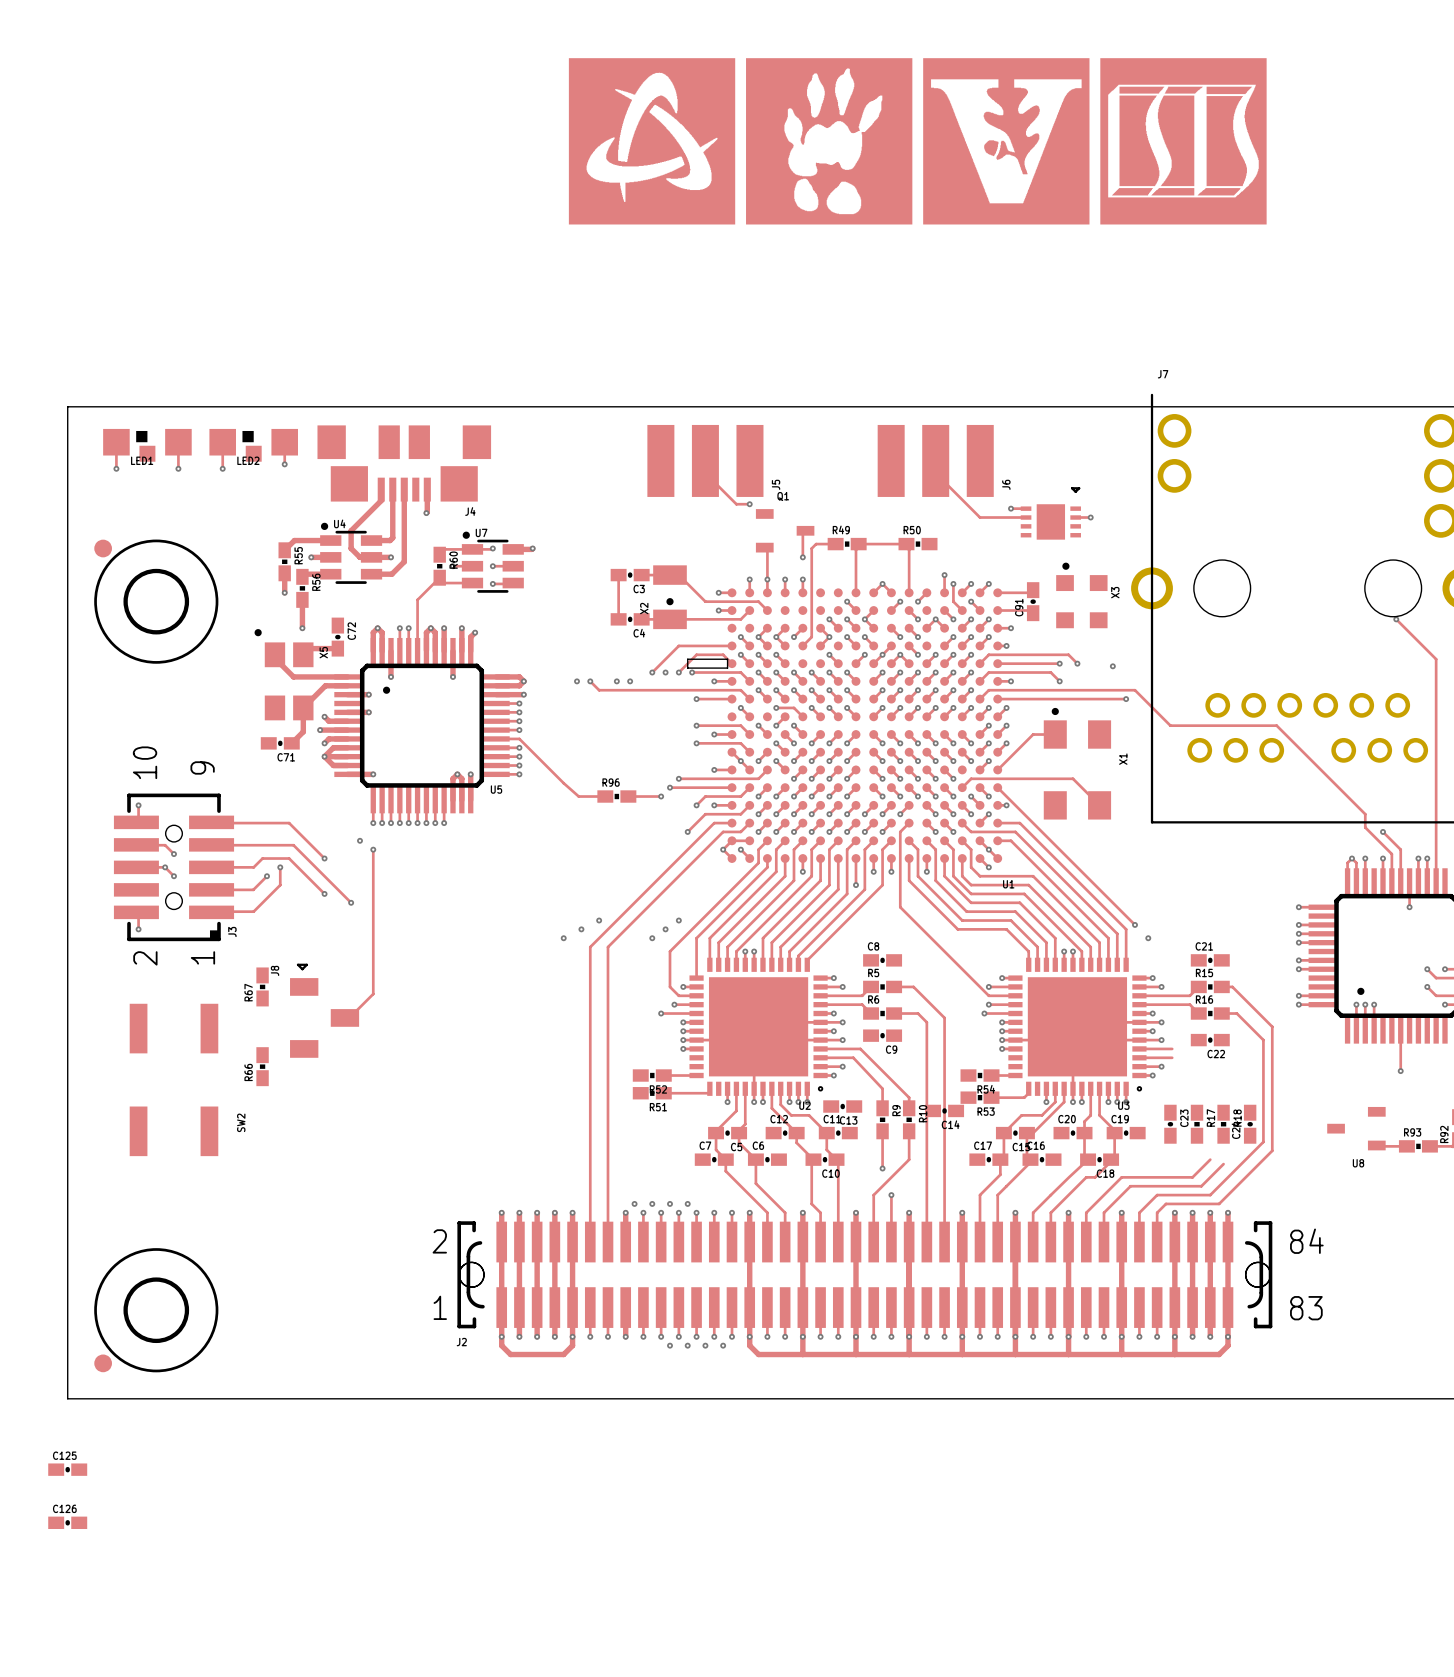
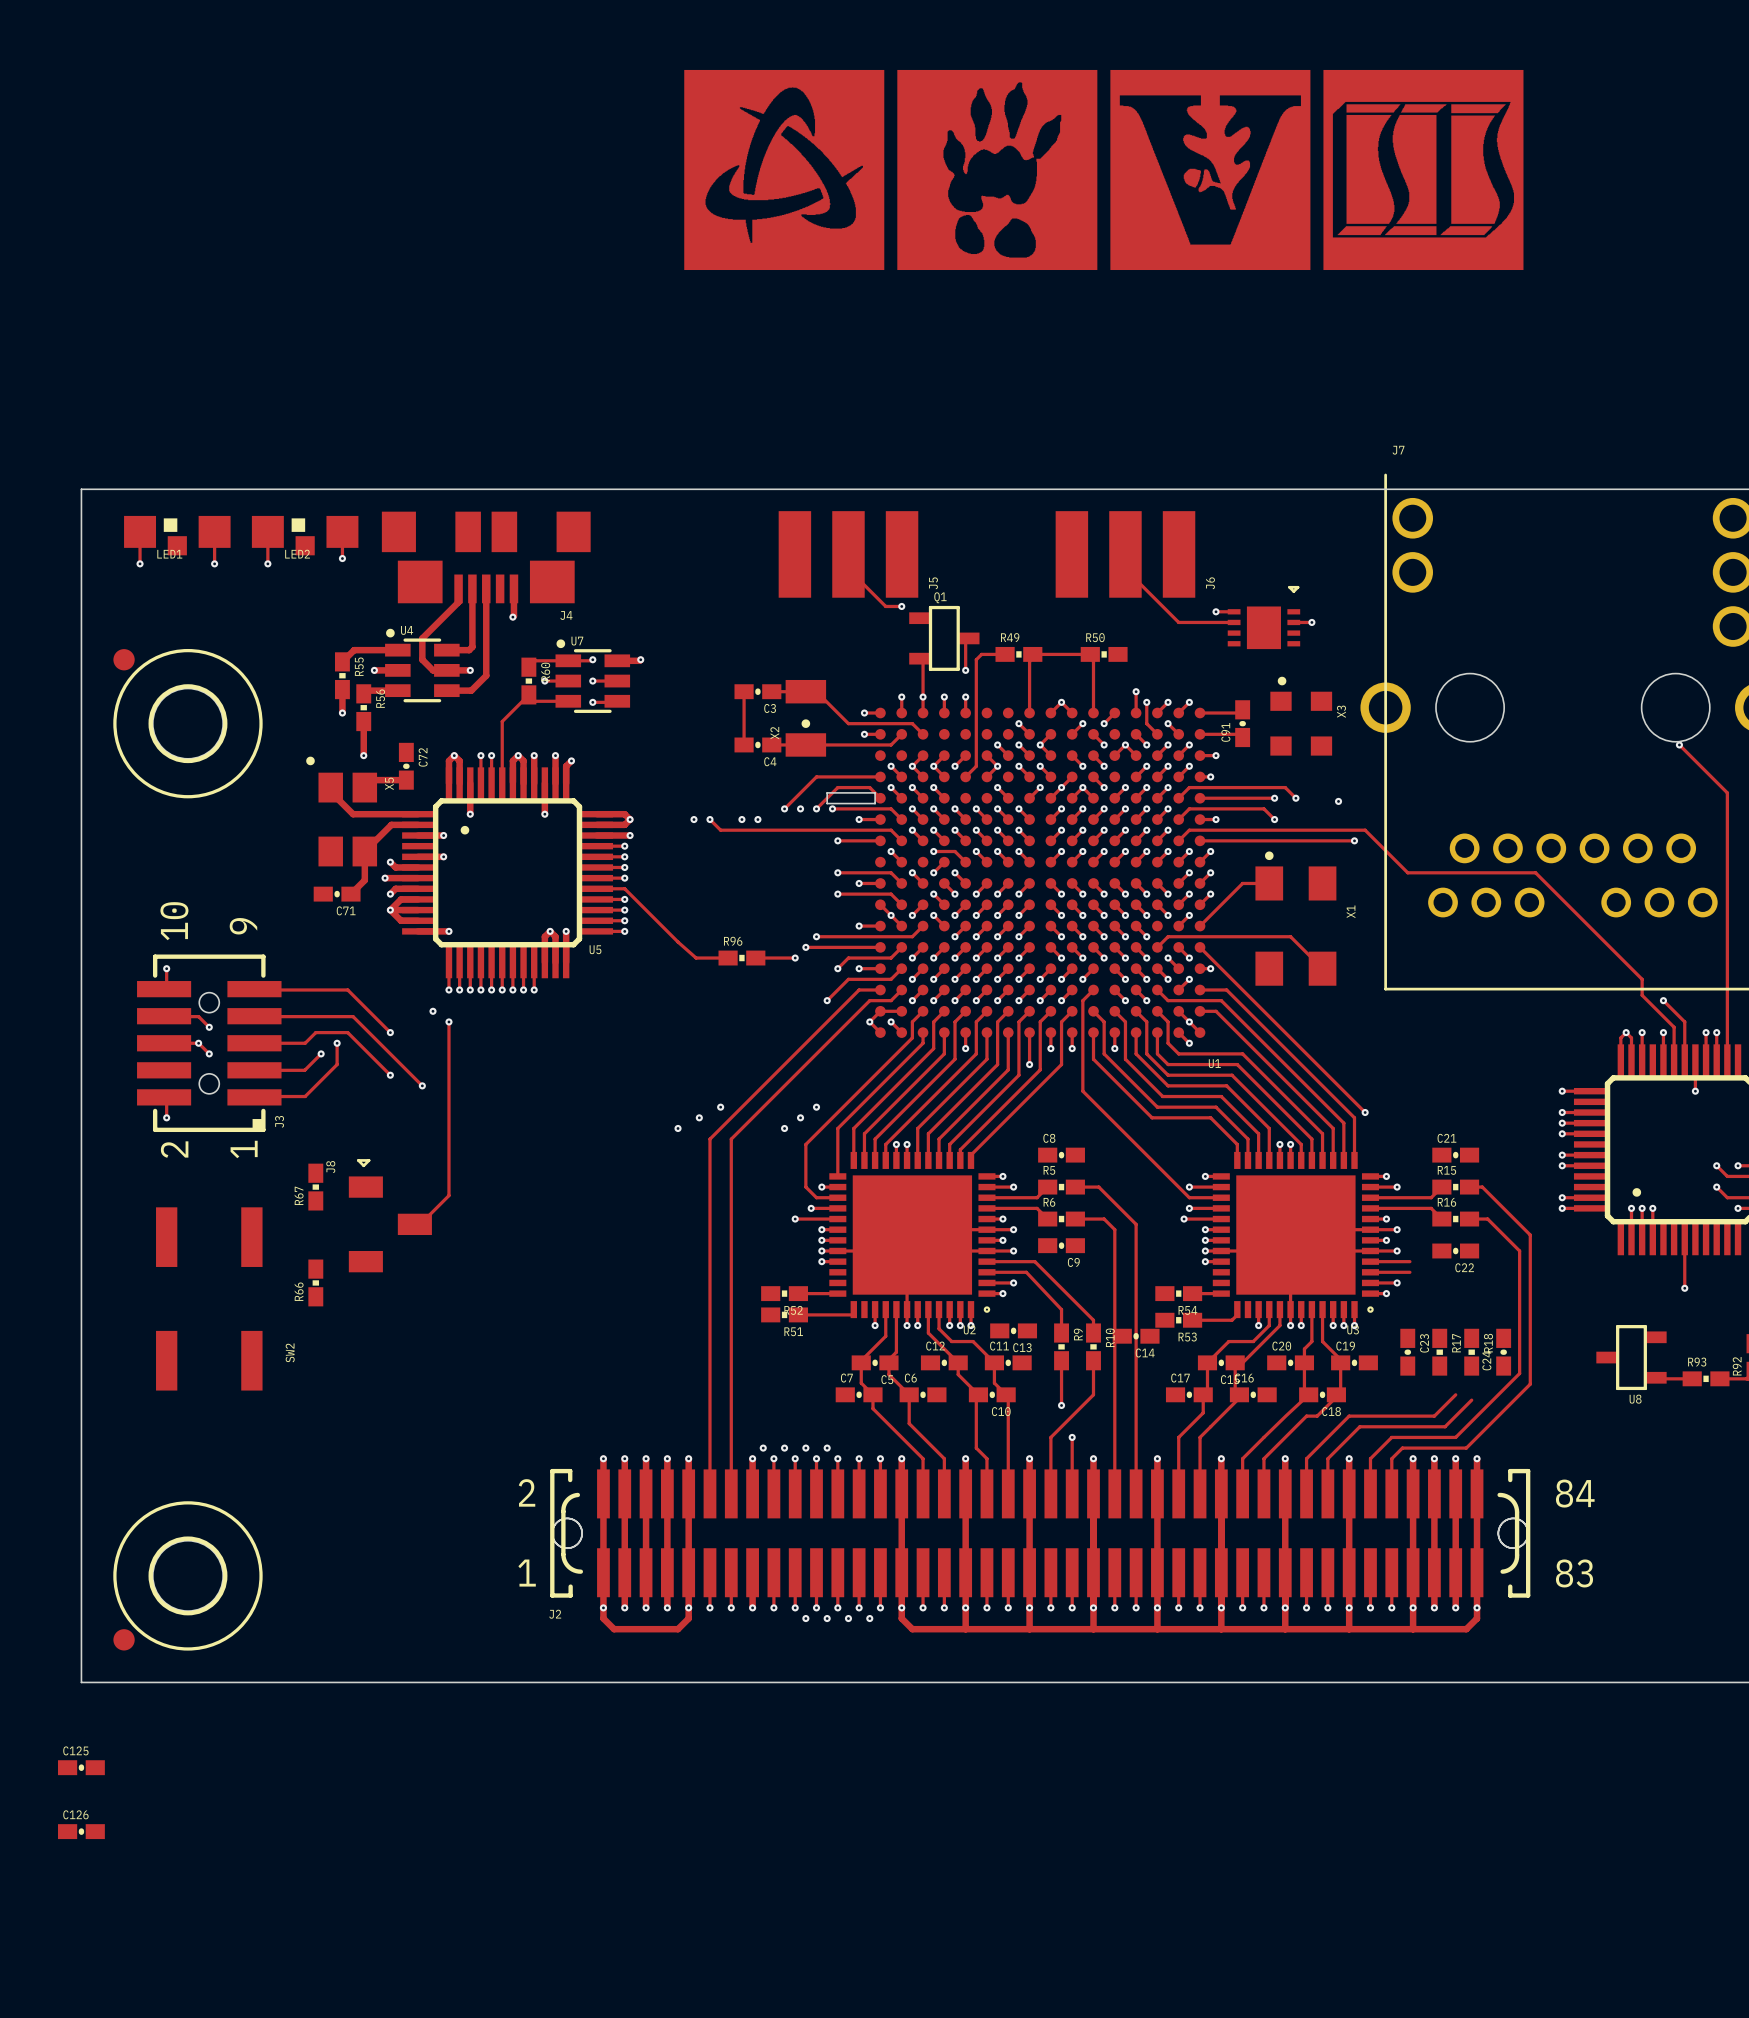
Q1 footprint: [755, 509, 815, 553] -> [909, 605, 980, 671]
via: (1148, 938) -> none
U8 footprint: [1327, 1106, 1386, 1151] -> [1596, 1325, 1667, 1391]

